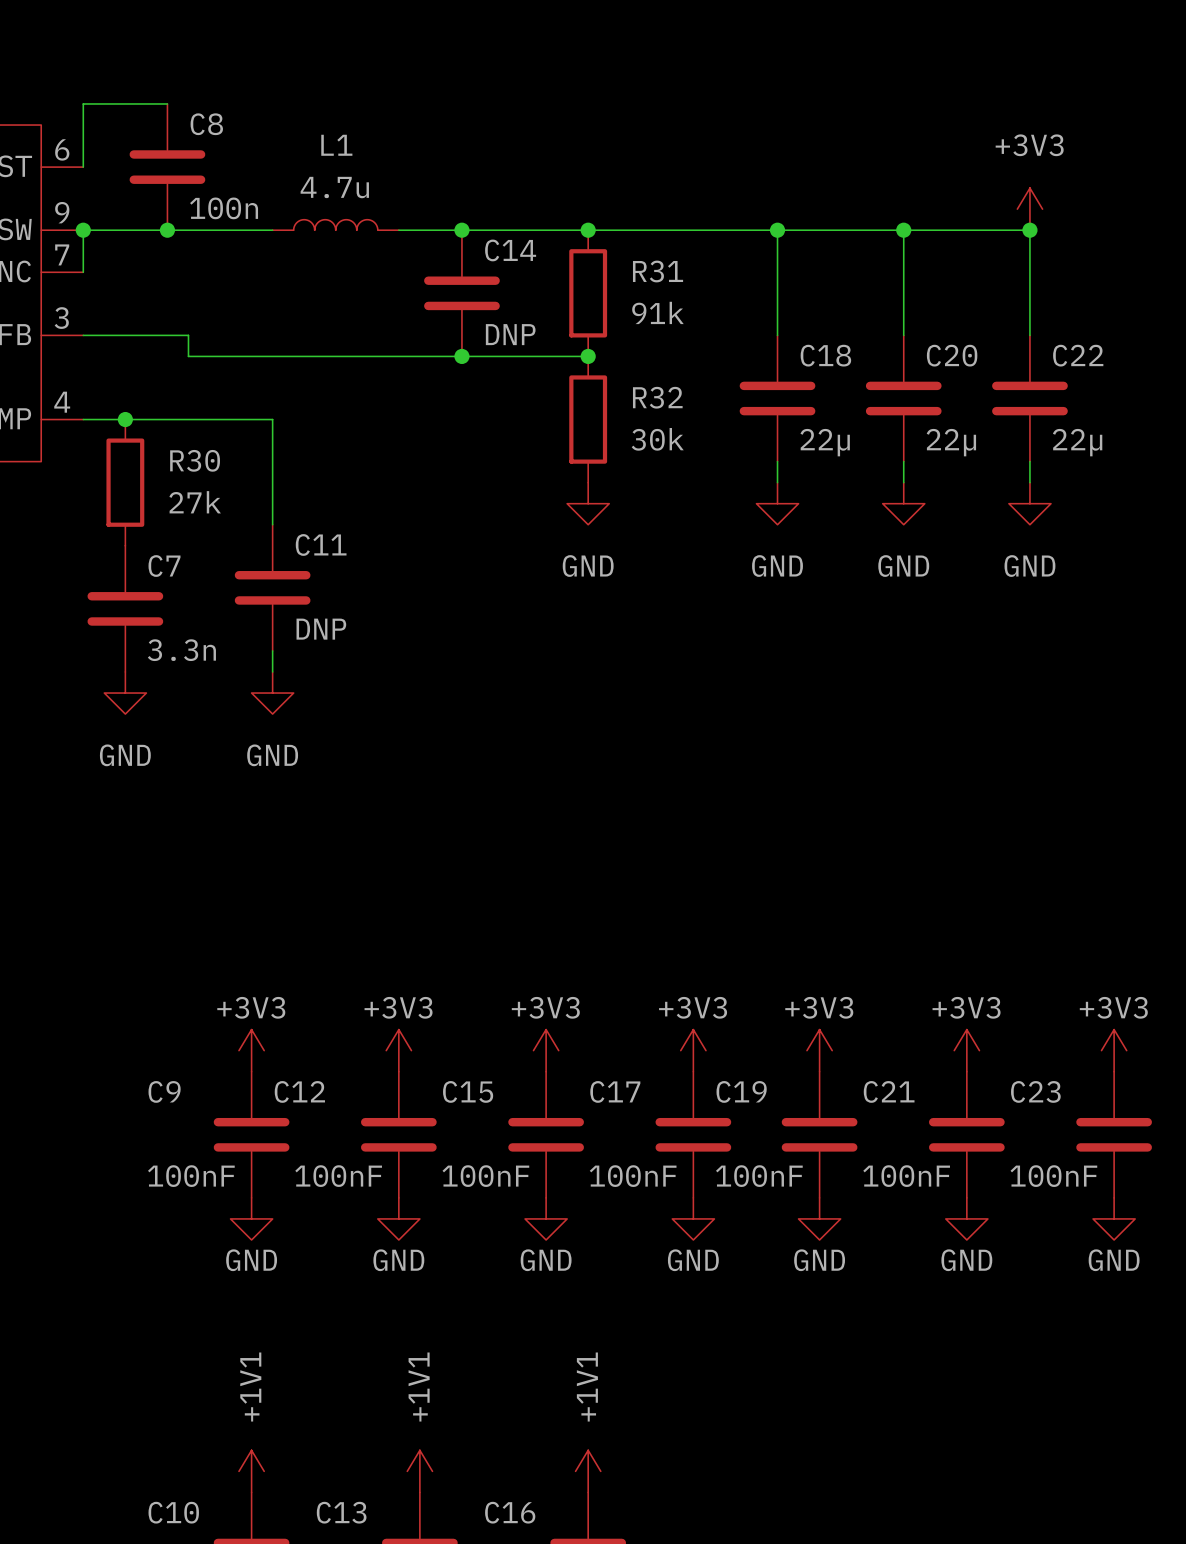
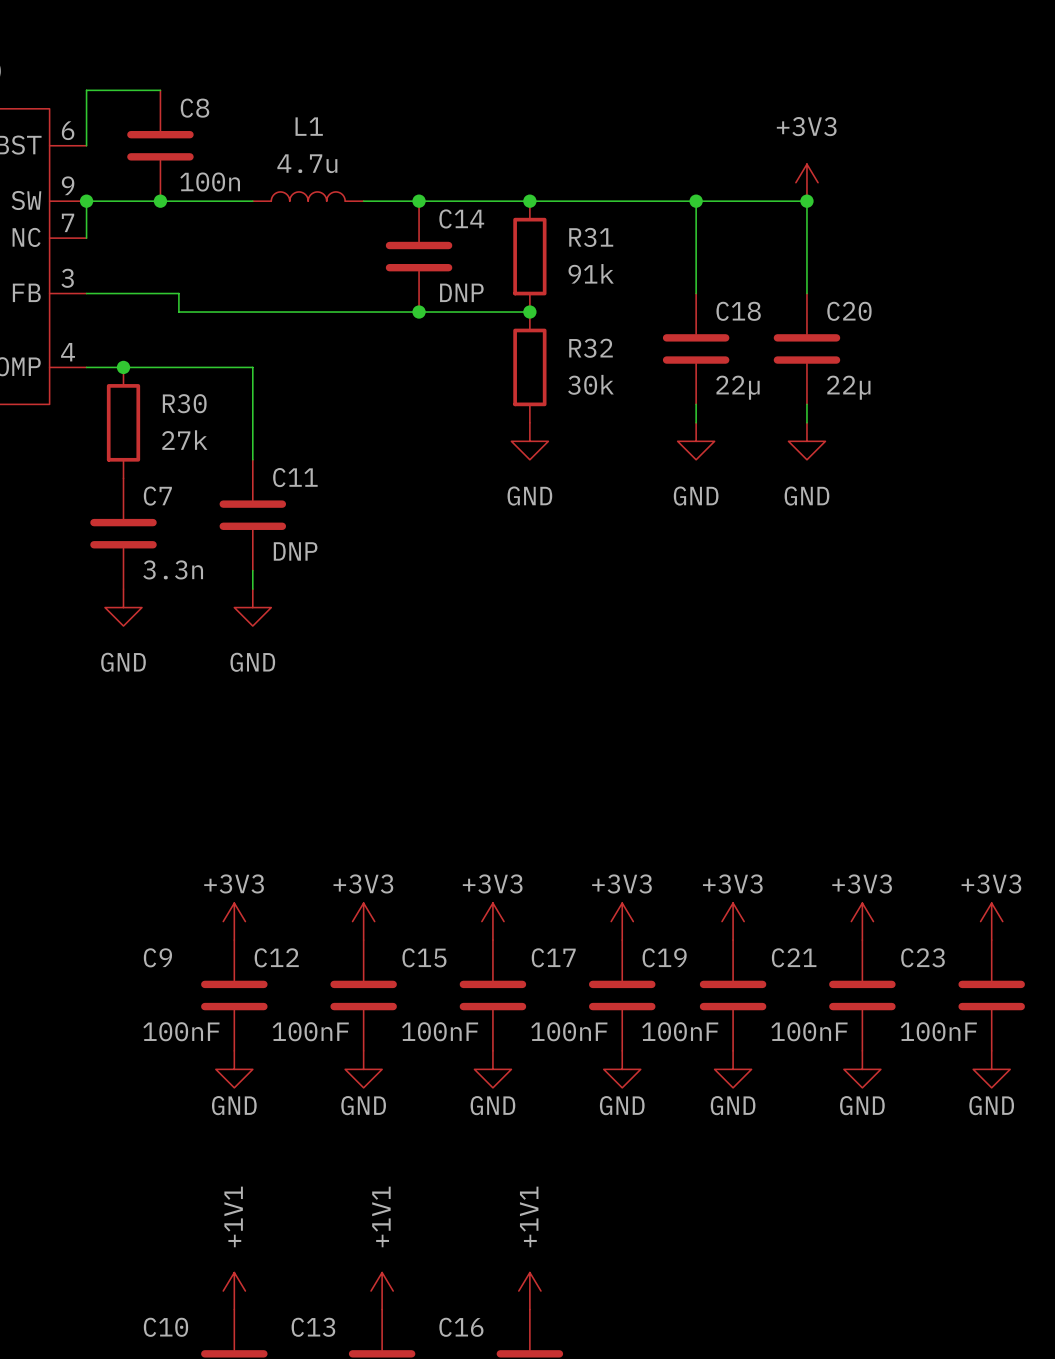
power symbol position: +3V3 (1029, 209) -> +3V3 (806, 182)
wire: (903, 230) (1029, 230) (1029, 335) -> none
junction: (1029, 230) -> none
C22: 22µ (1029, 398) -> none
wire: (1029, 461) (1029, 482) -> none
power symbol: GND (1029, 503) -> none

